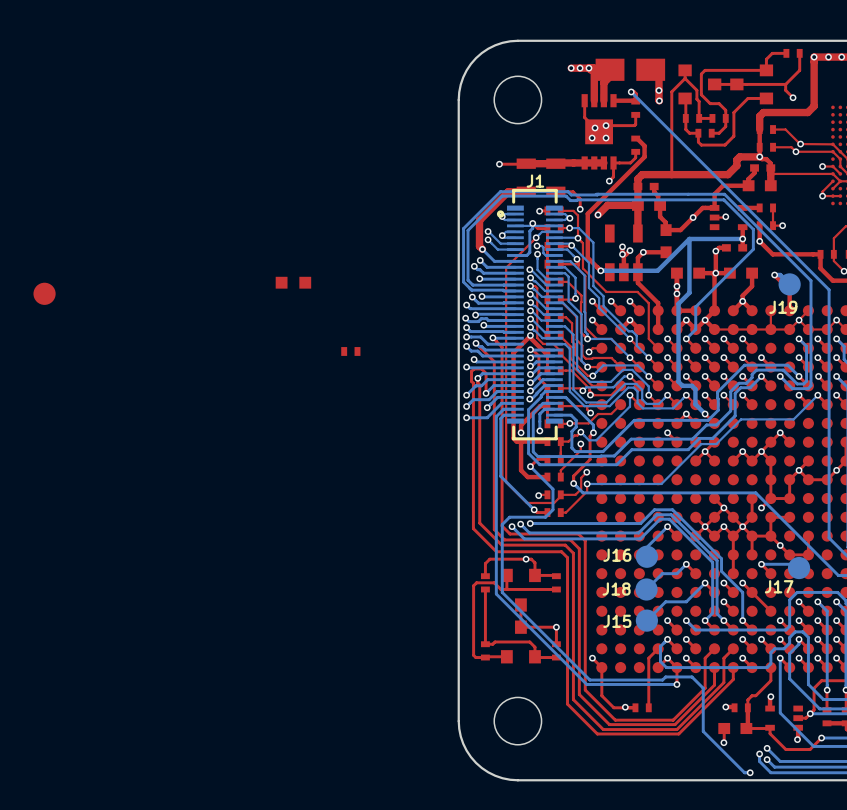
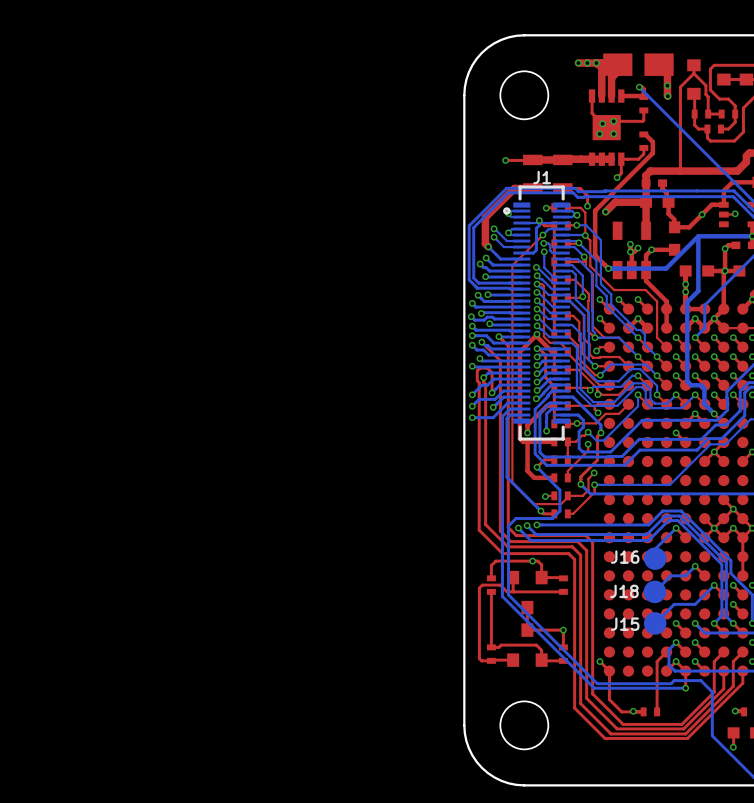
part: (293, 282) -> none
part: (44, 293) -> none
part: (350, 351) -> none

